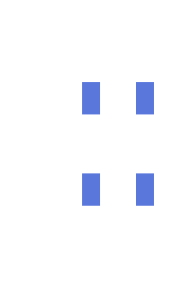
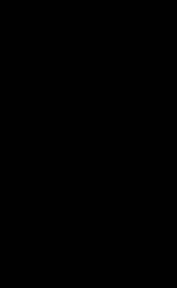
part: (118, 98) -> none
part: (118, 189) -> none

